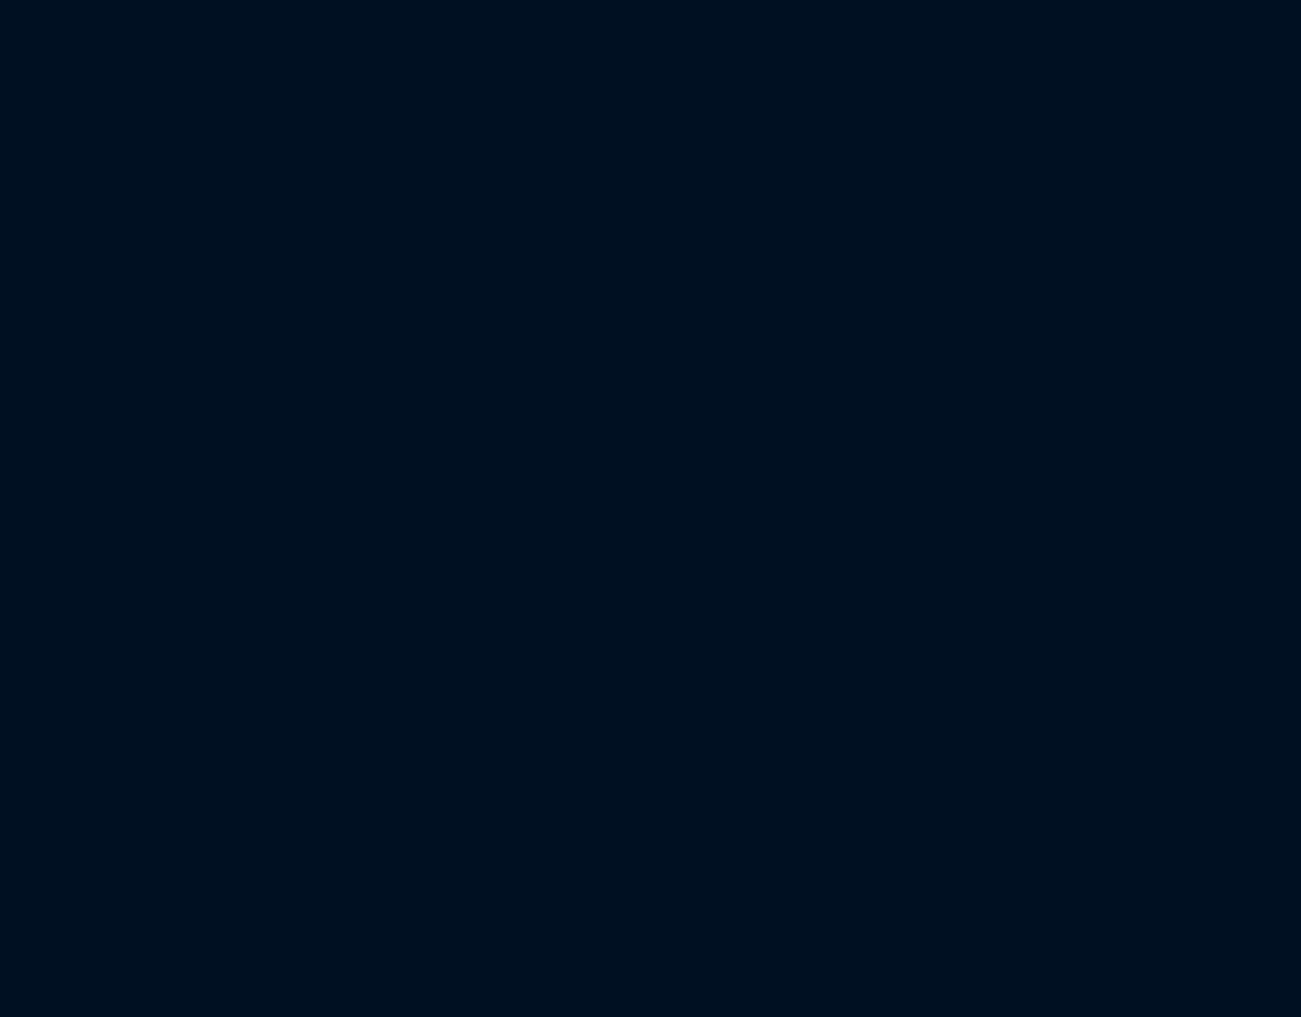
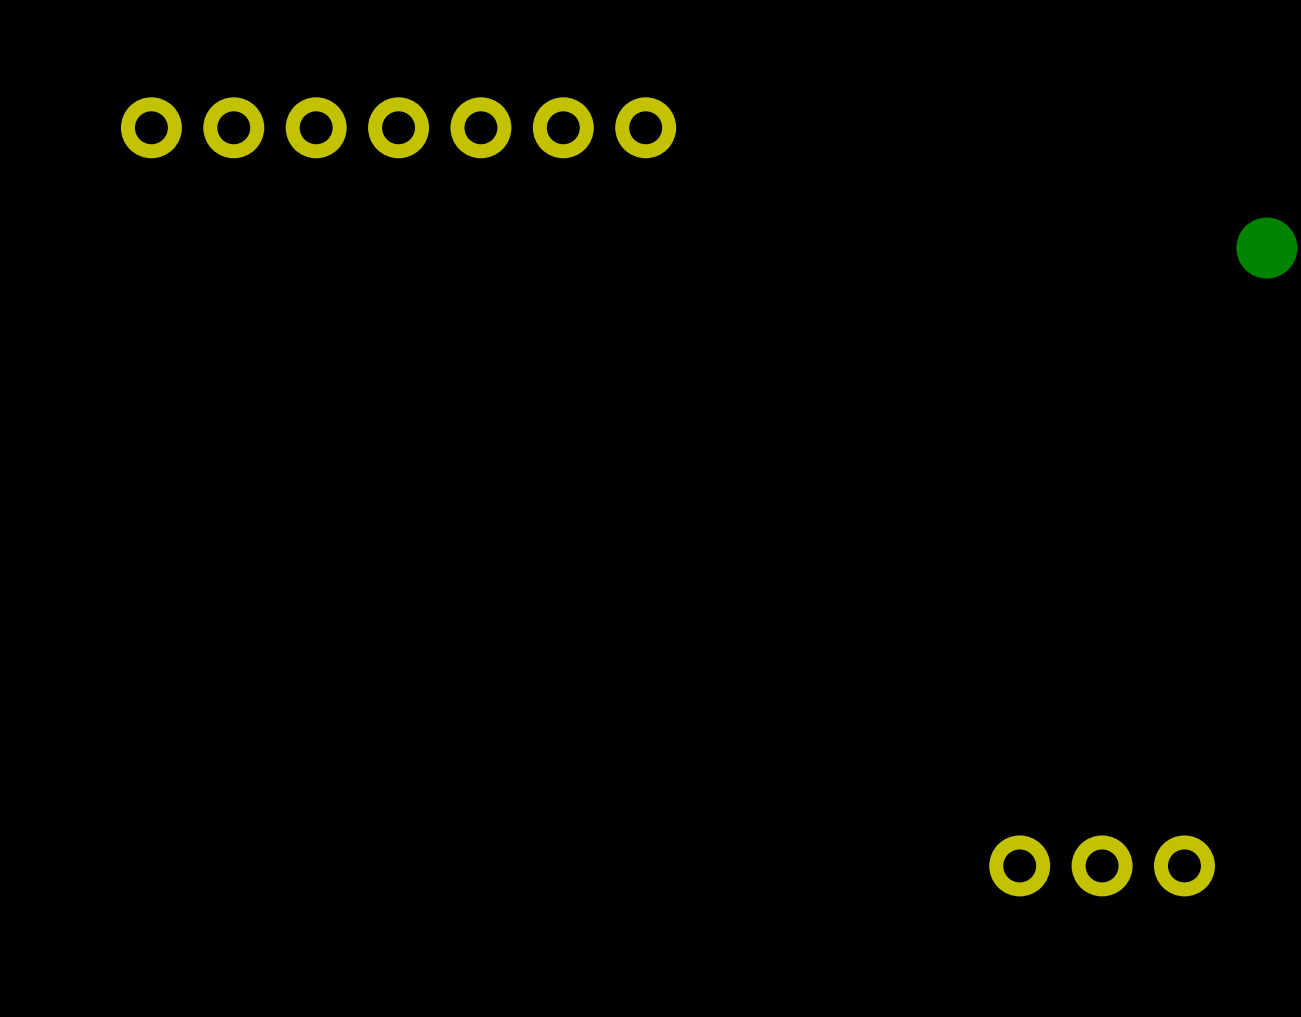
part: none -> (398, 127)
part: none -> (1266, 248)
part: none -> (1102, 865)

